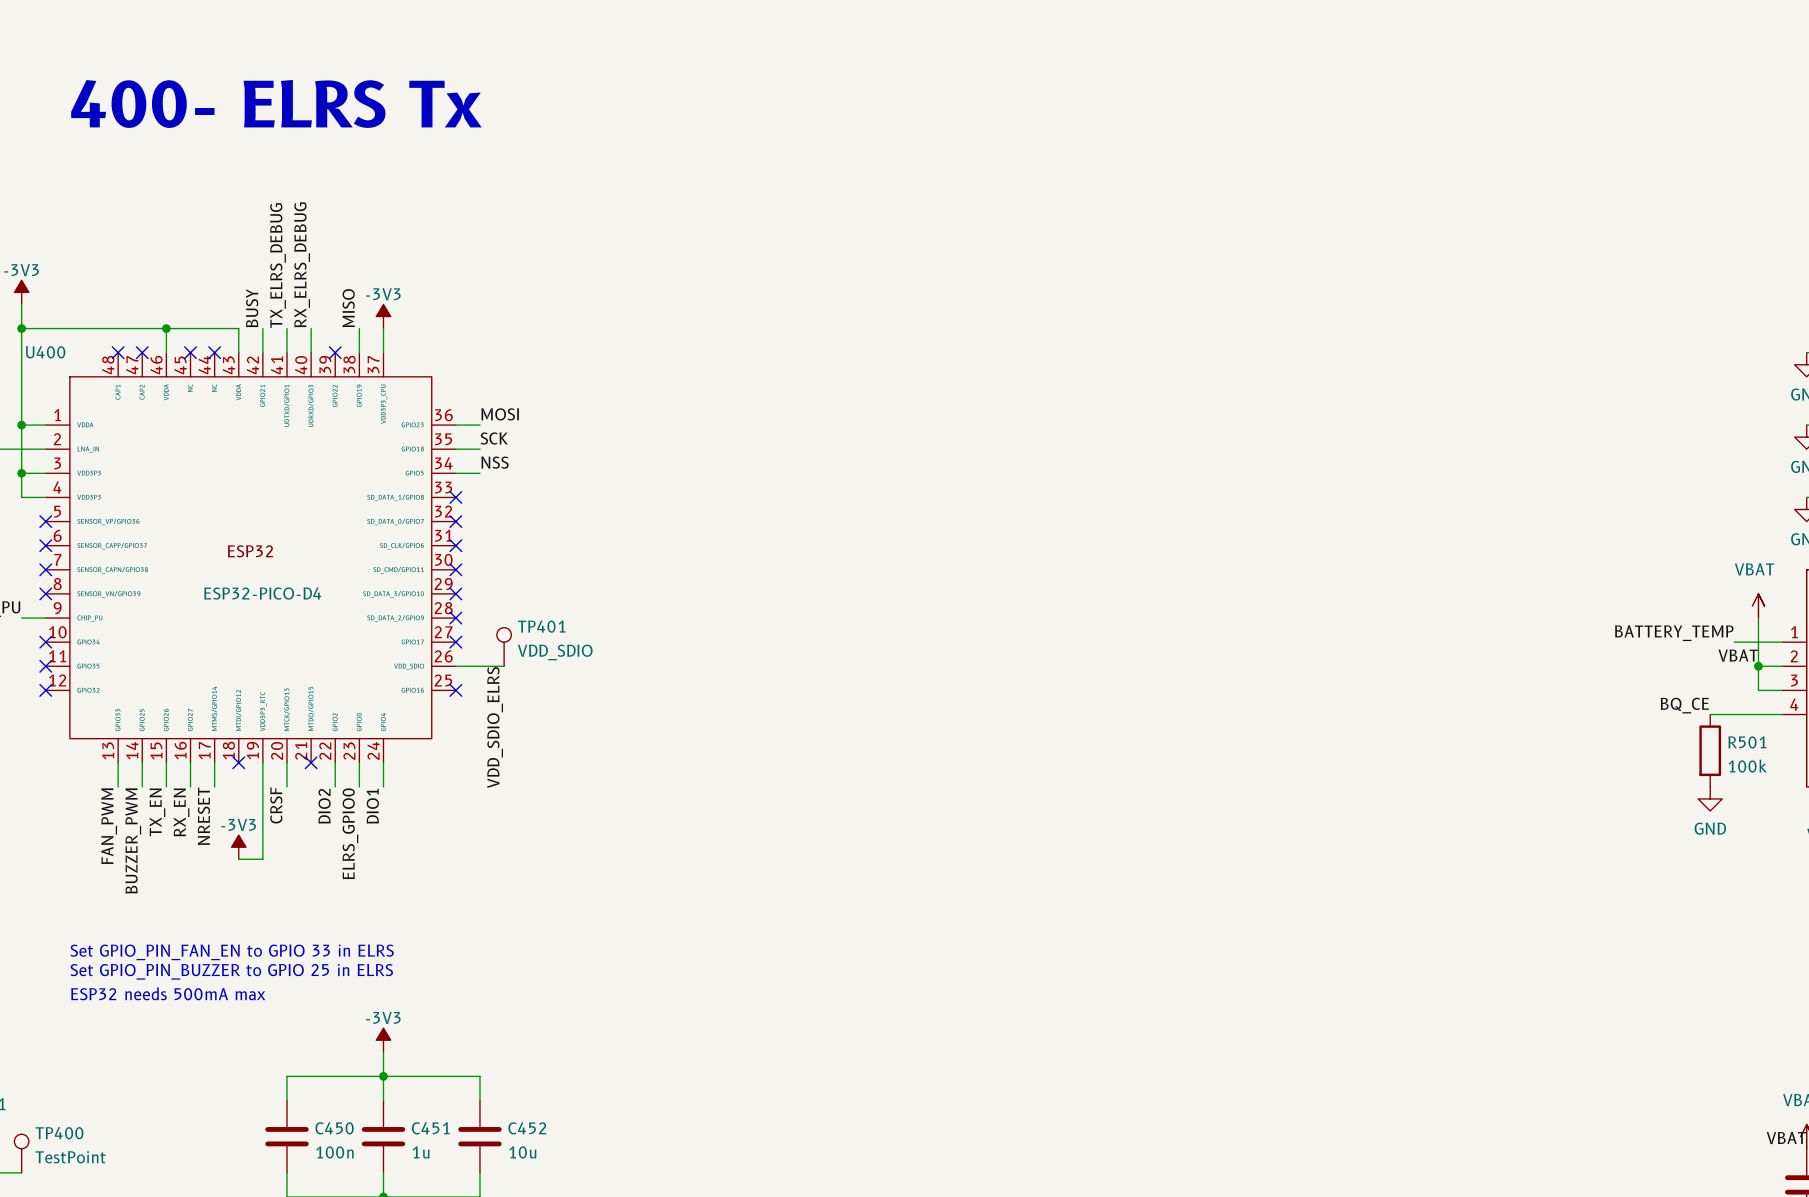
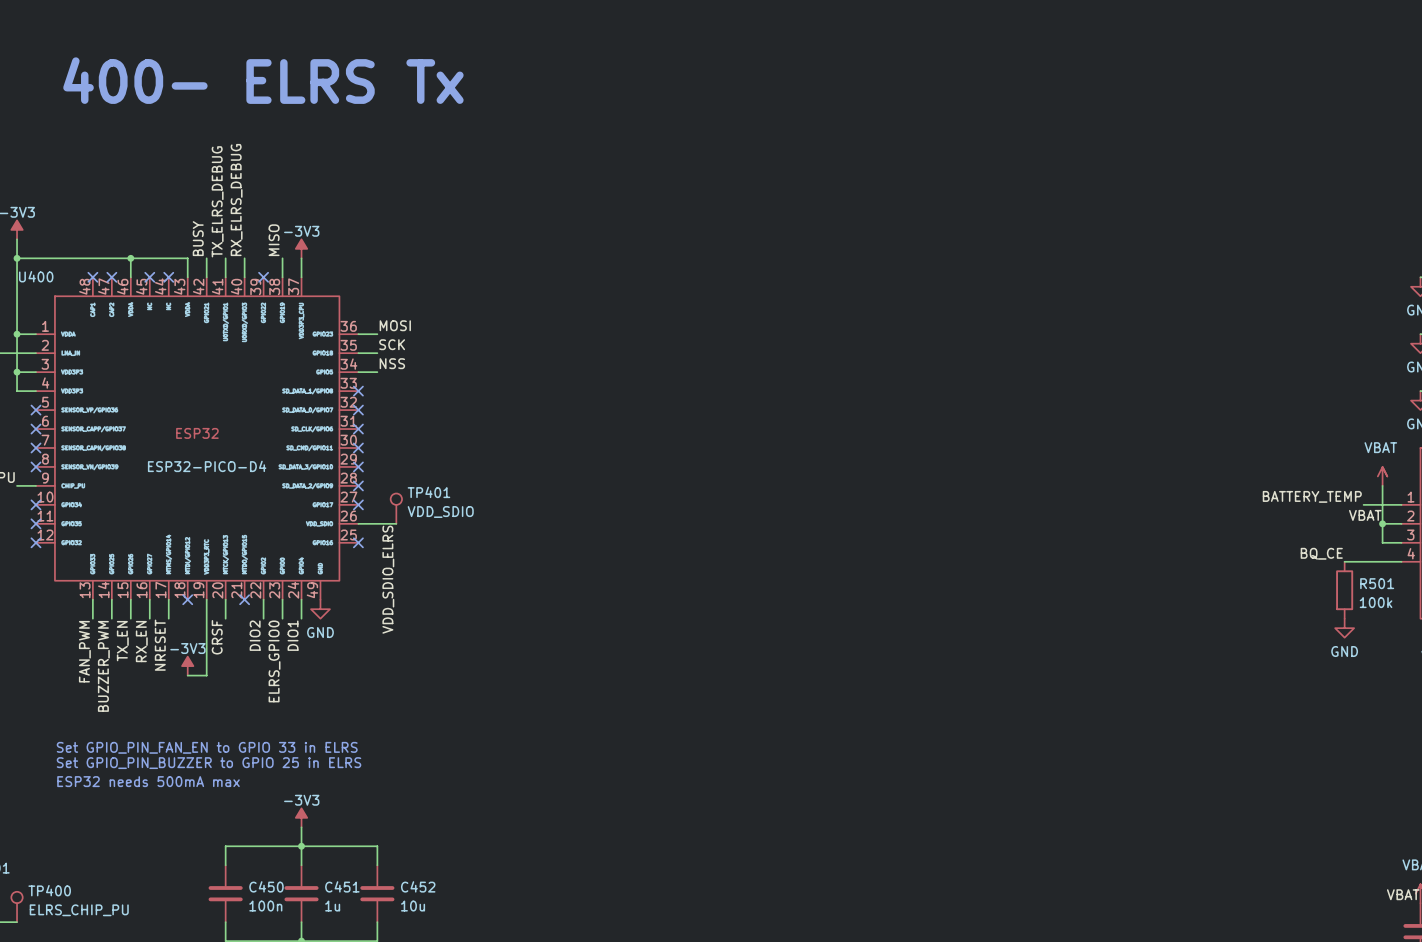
U400 symbol: [45, 352, 456, 763] -> [35, 277, 359, 600]
power symbol: none -> GND (320, 609)
TP400 value: TestPoint (70, 1157) -> ELRS_CHIP_PU (79, 910)

